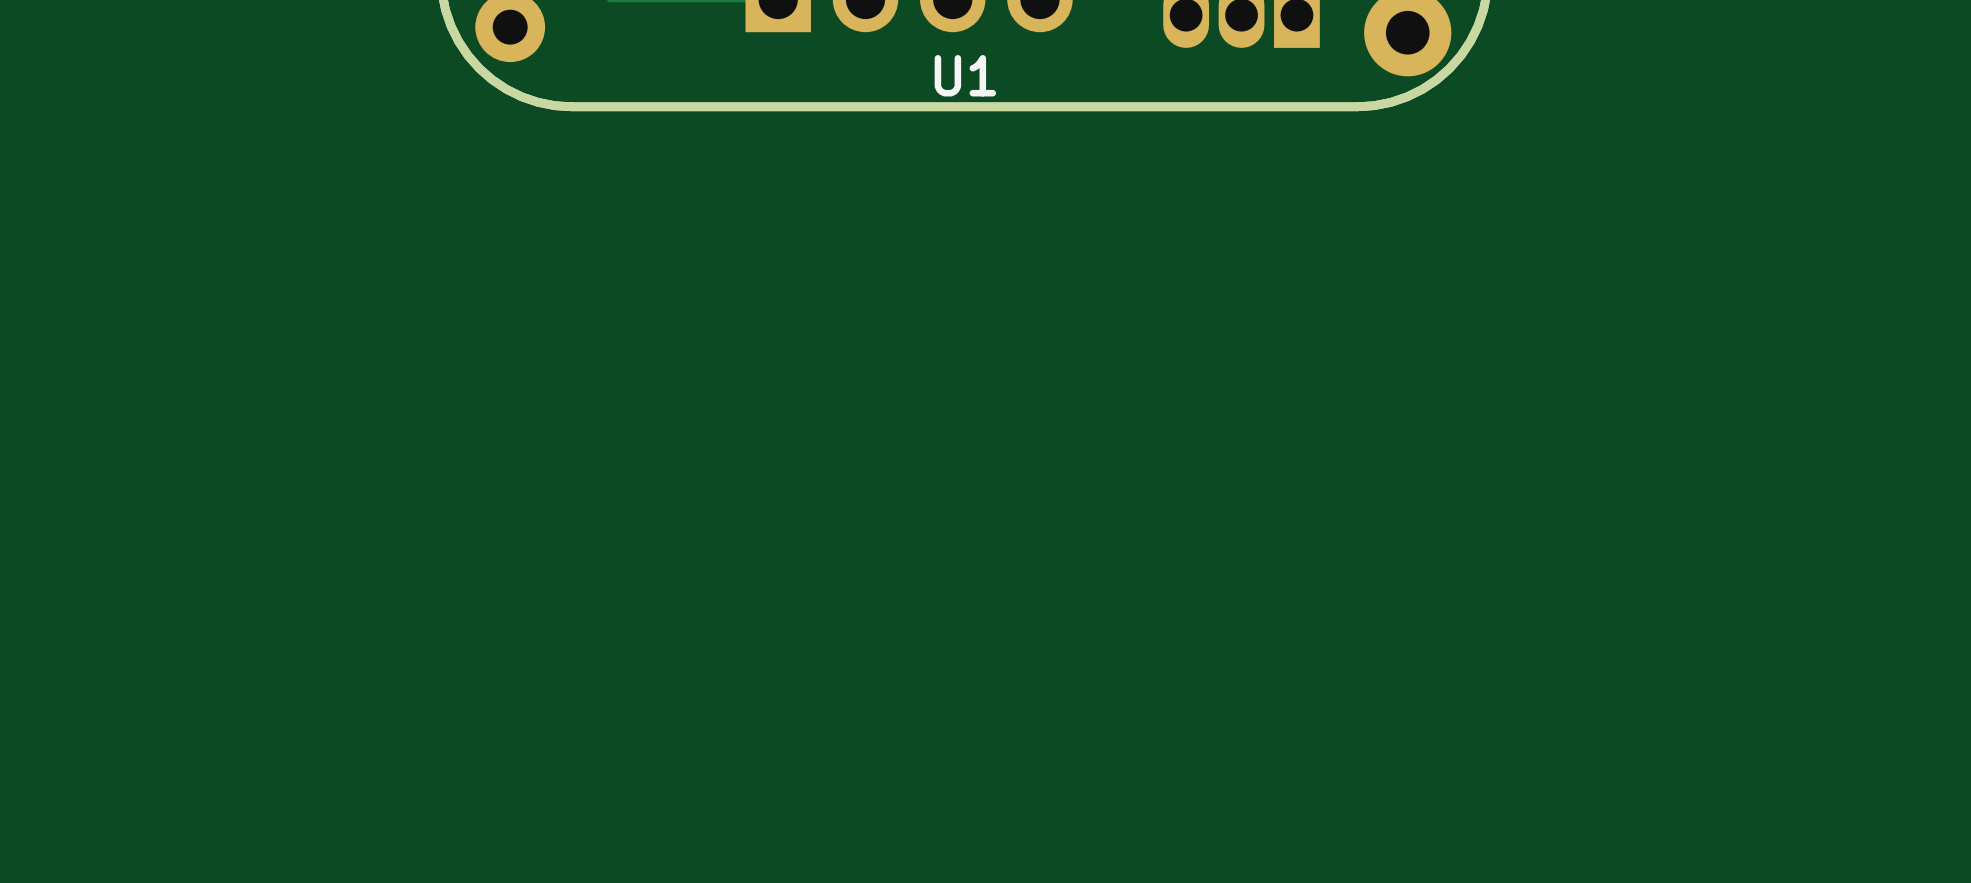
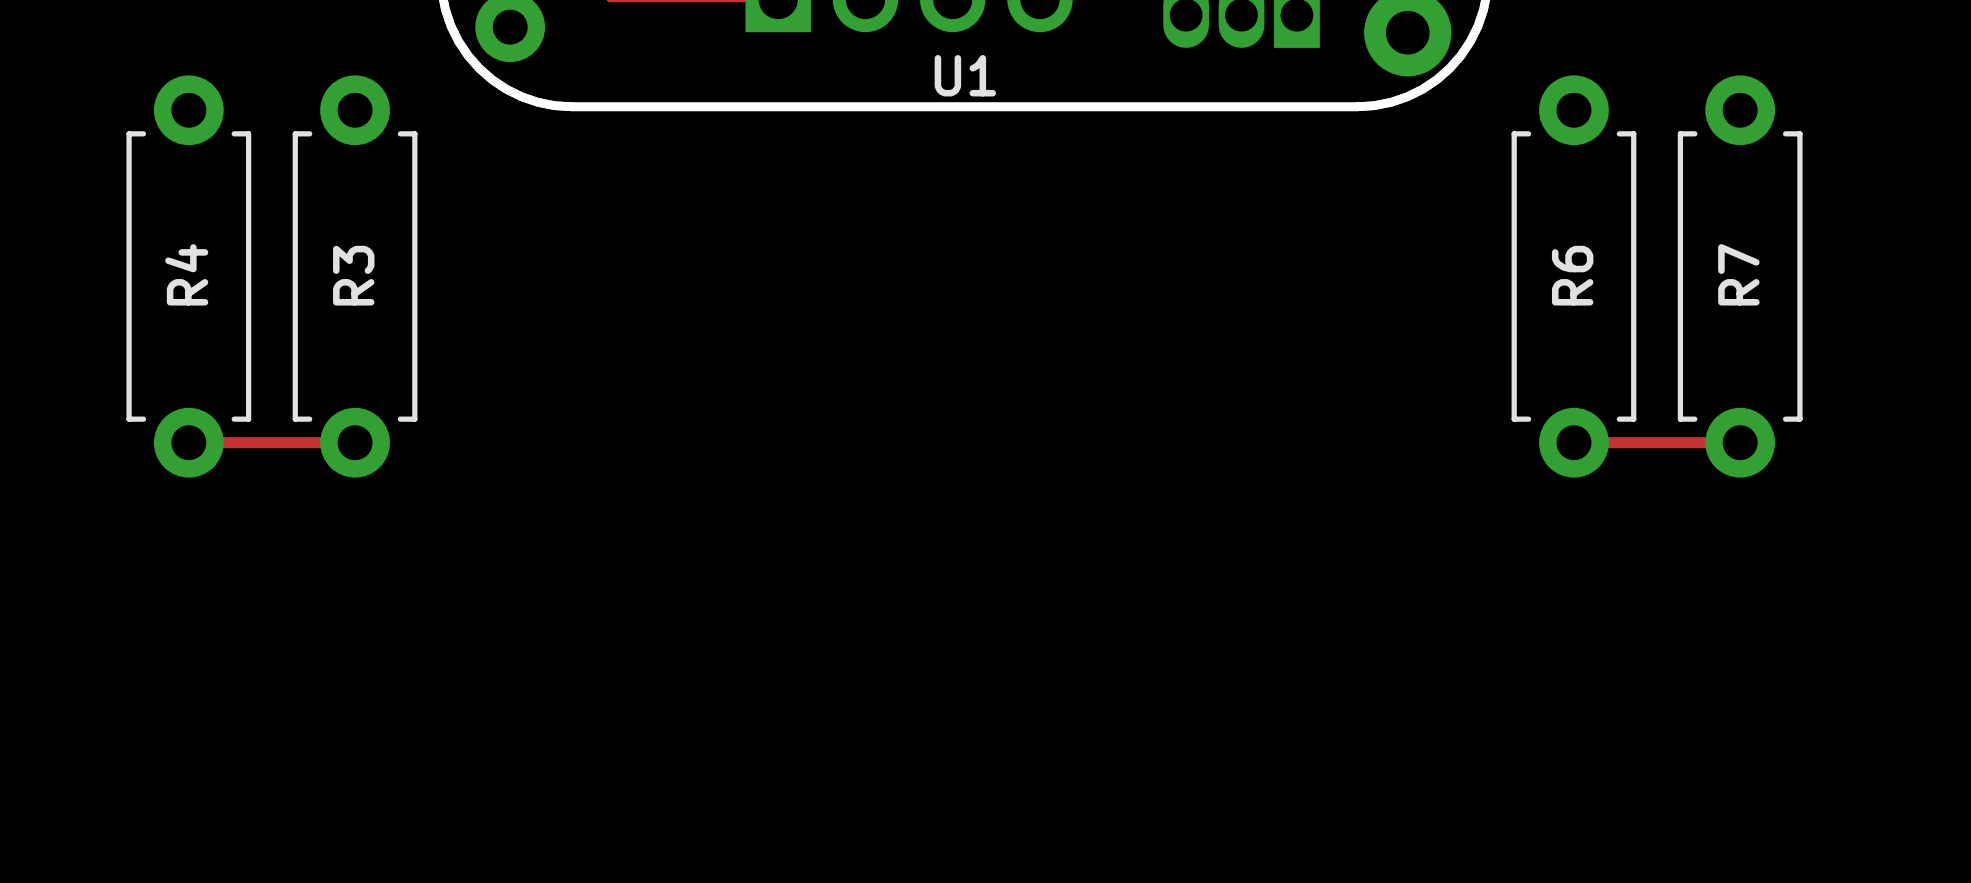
R4: none -> (188, 276)
R3: none -> (355, 276)
R6: none -> (1573, 276)
R7: none -> (1740, 276)
track: none -> (188, 442) (355, 442)
track: none -> (1573, 442) (1740, 442)

